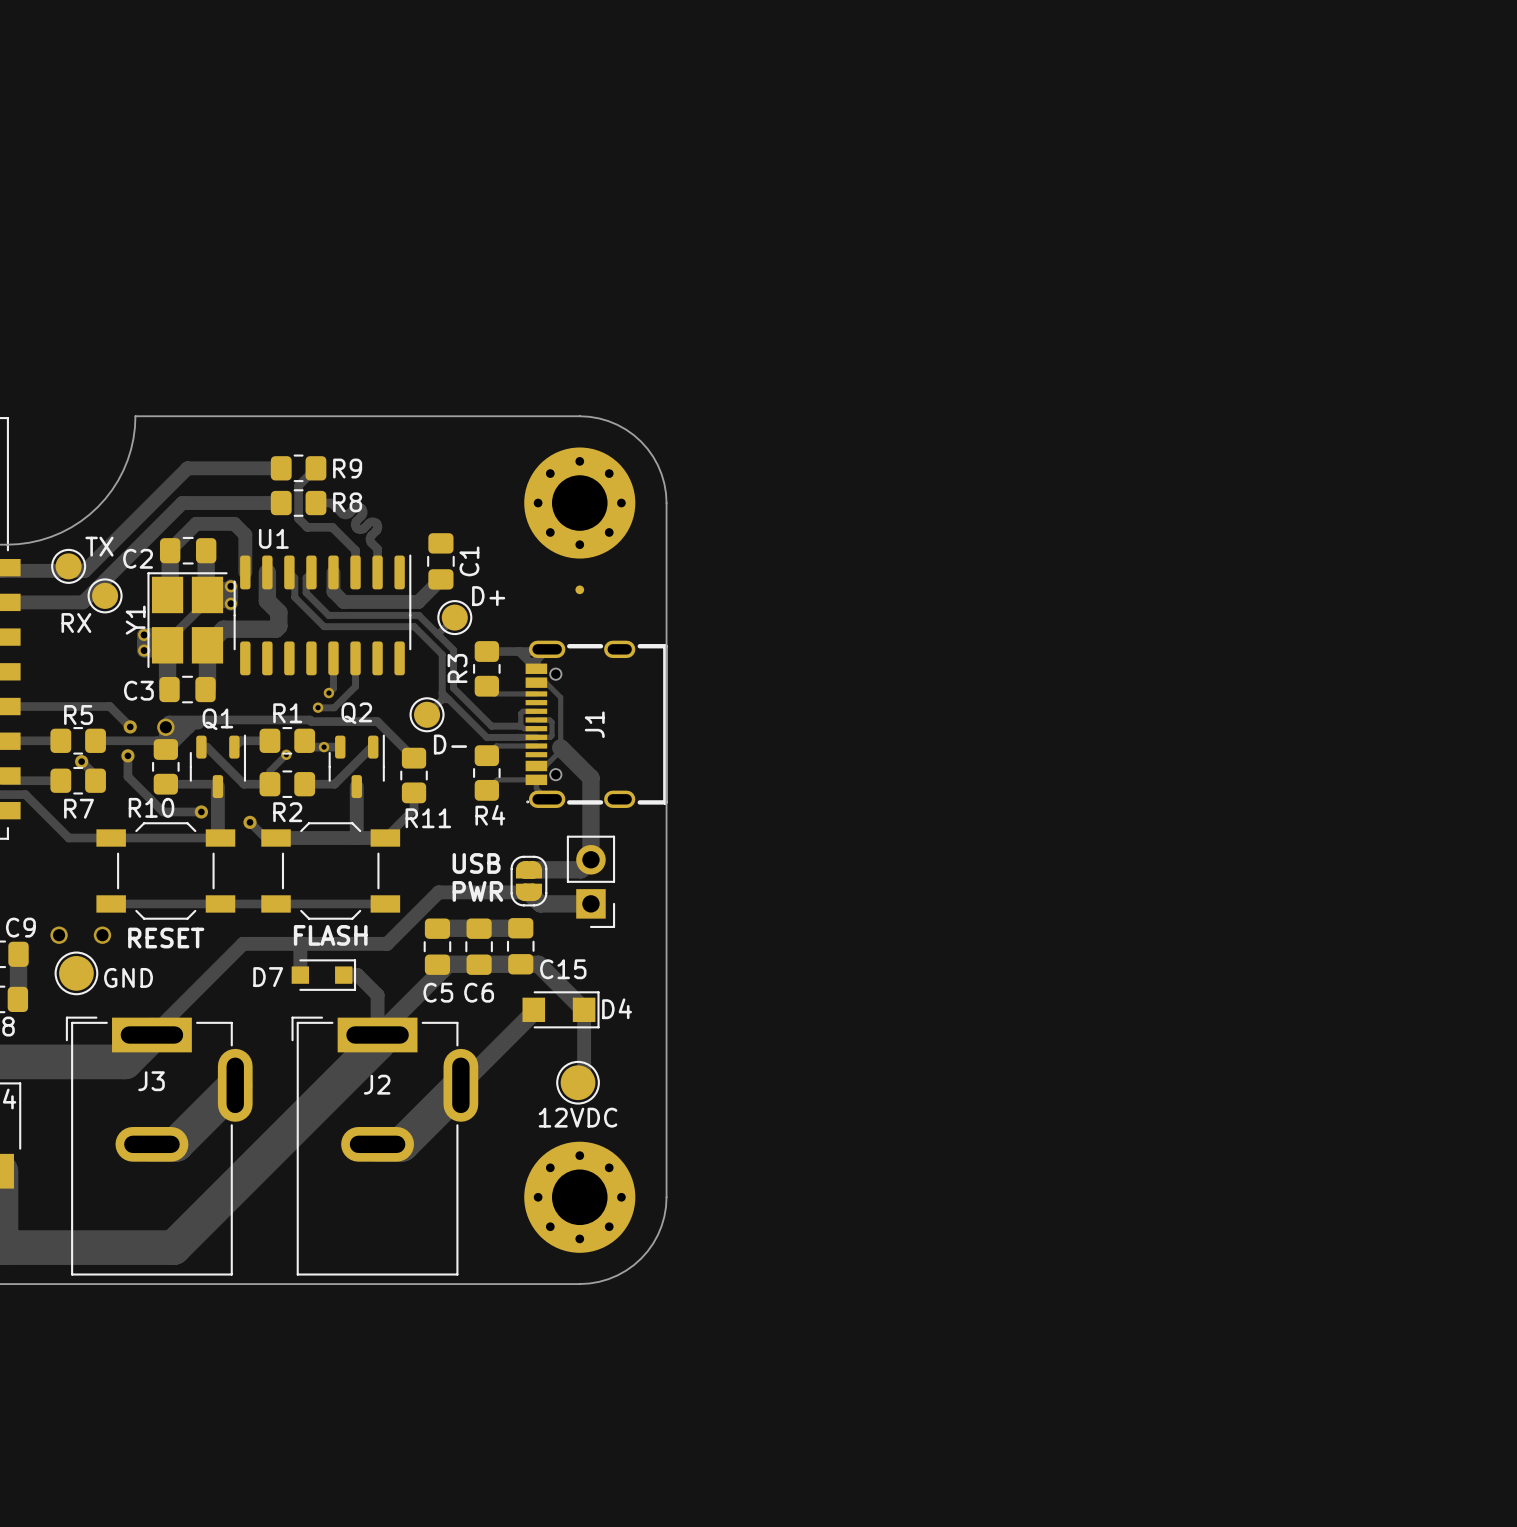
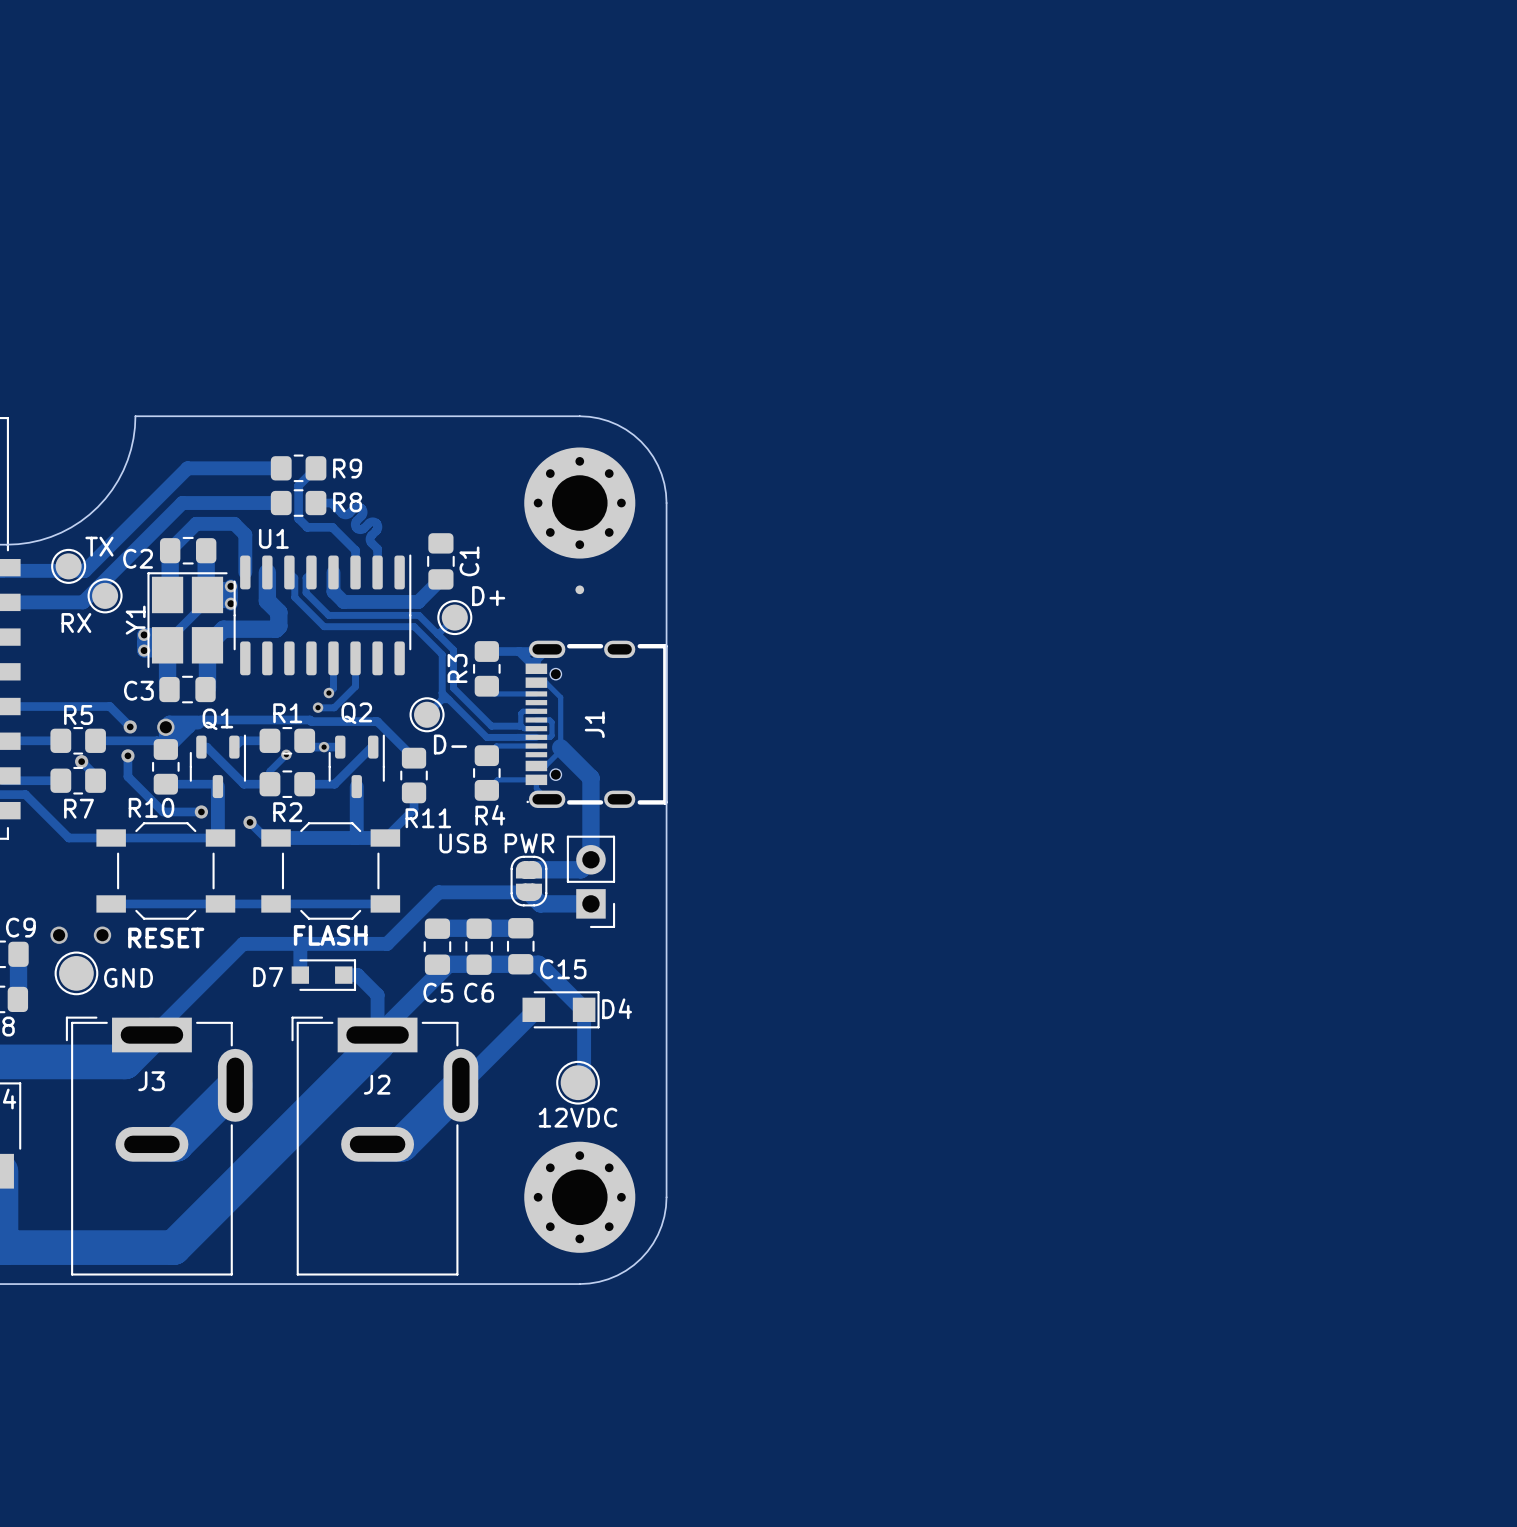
part value: none -> USB PWR (496, 843)
text: USB (476, 863) -> none
text: PWR (477, 891) -> none

